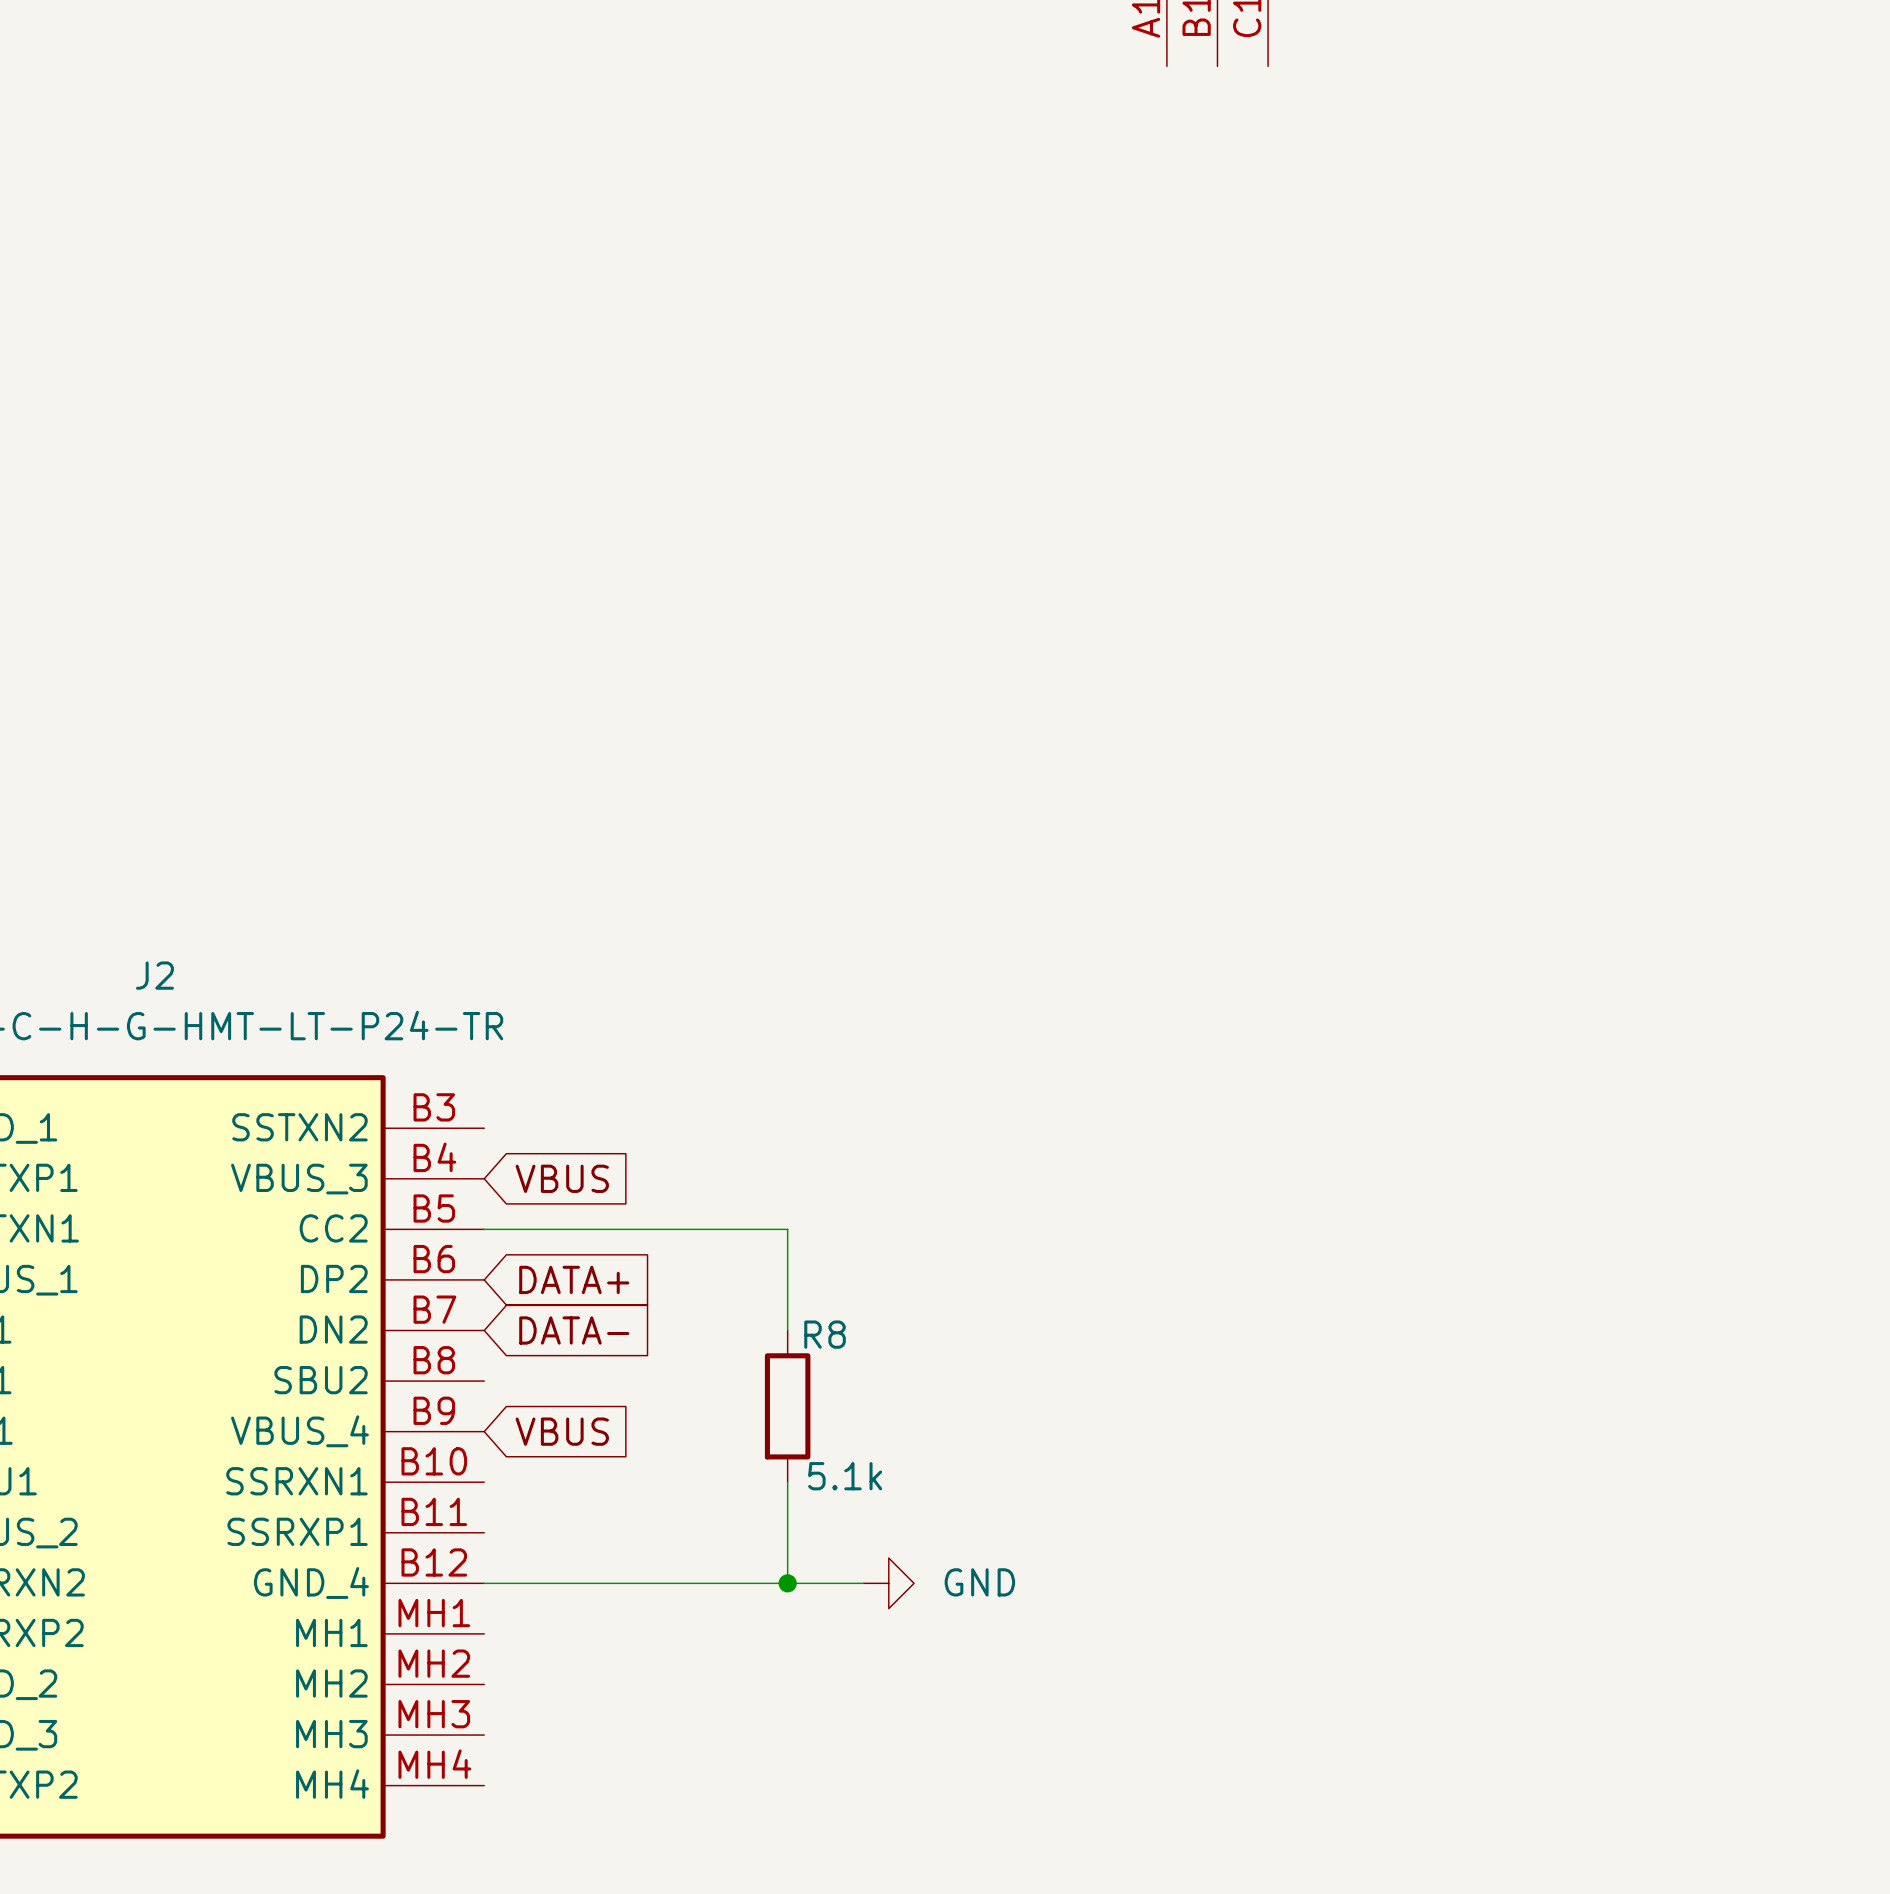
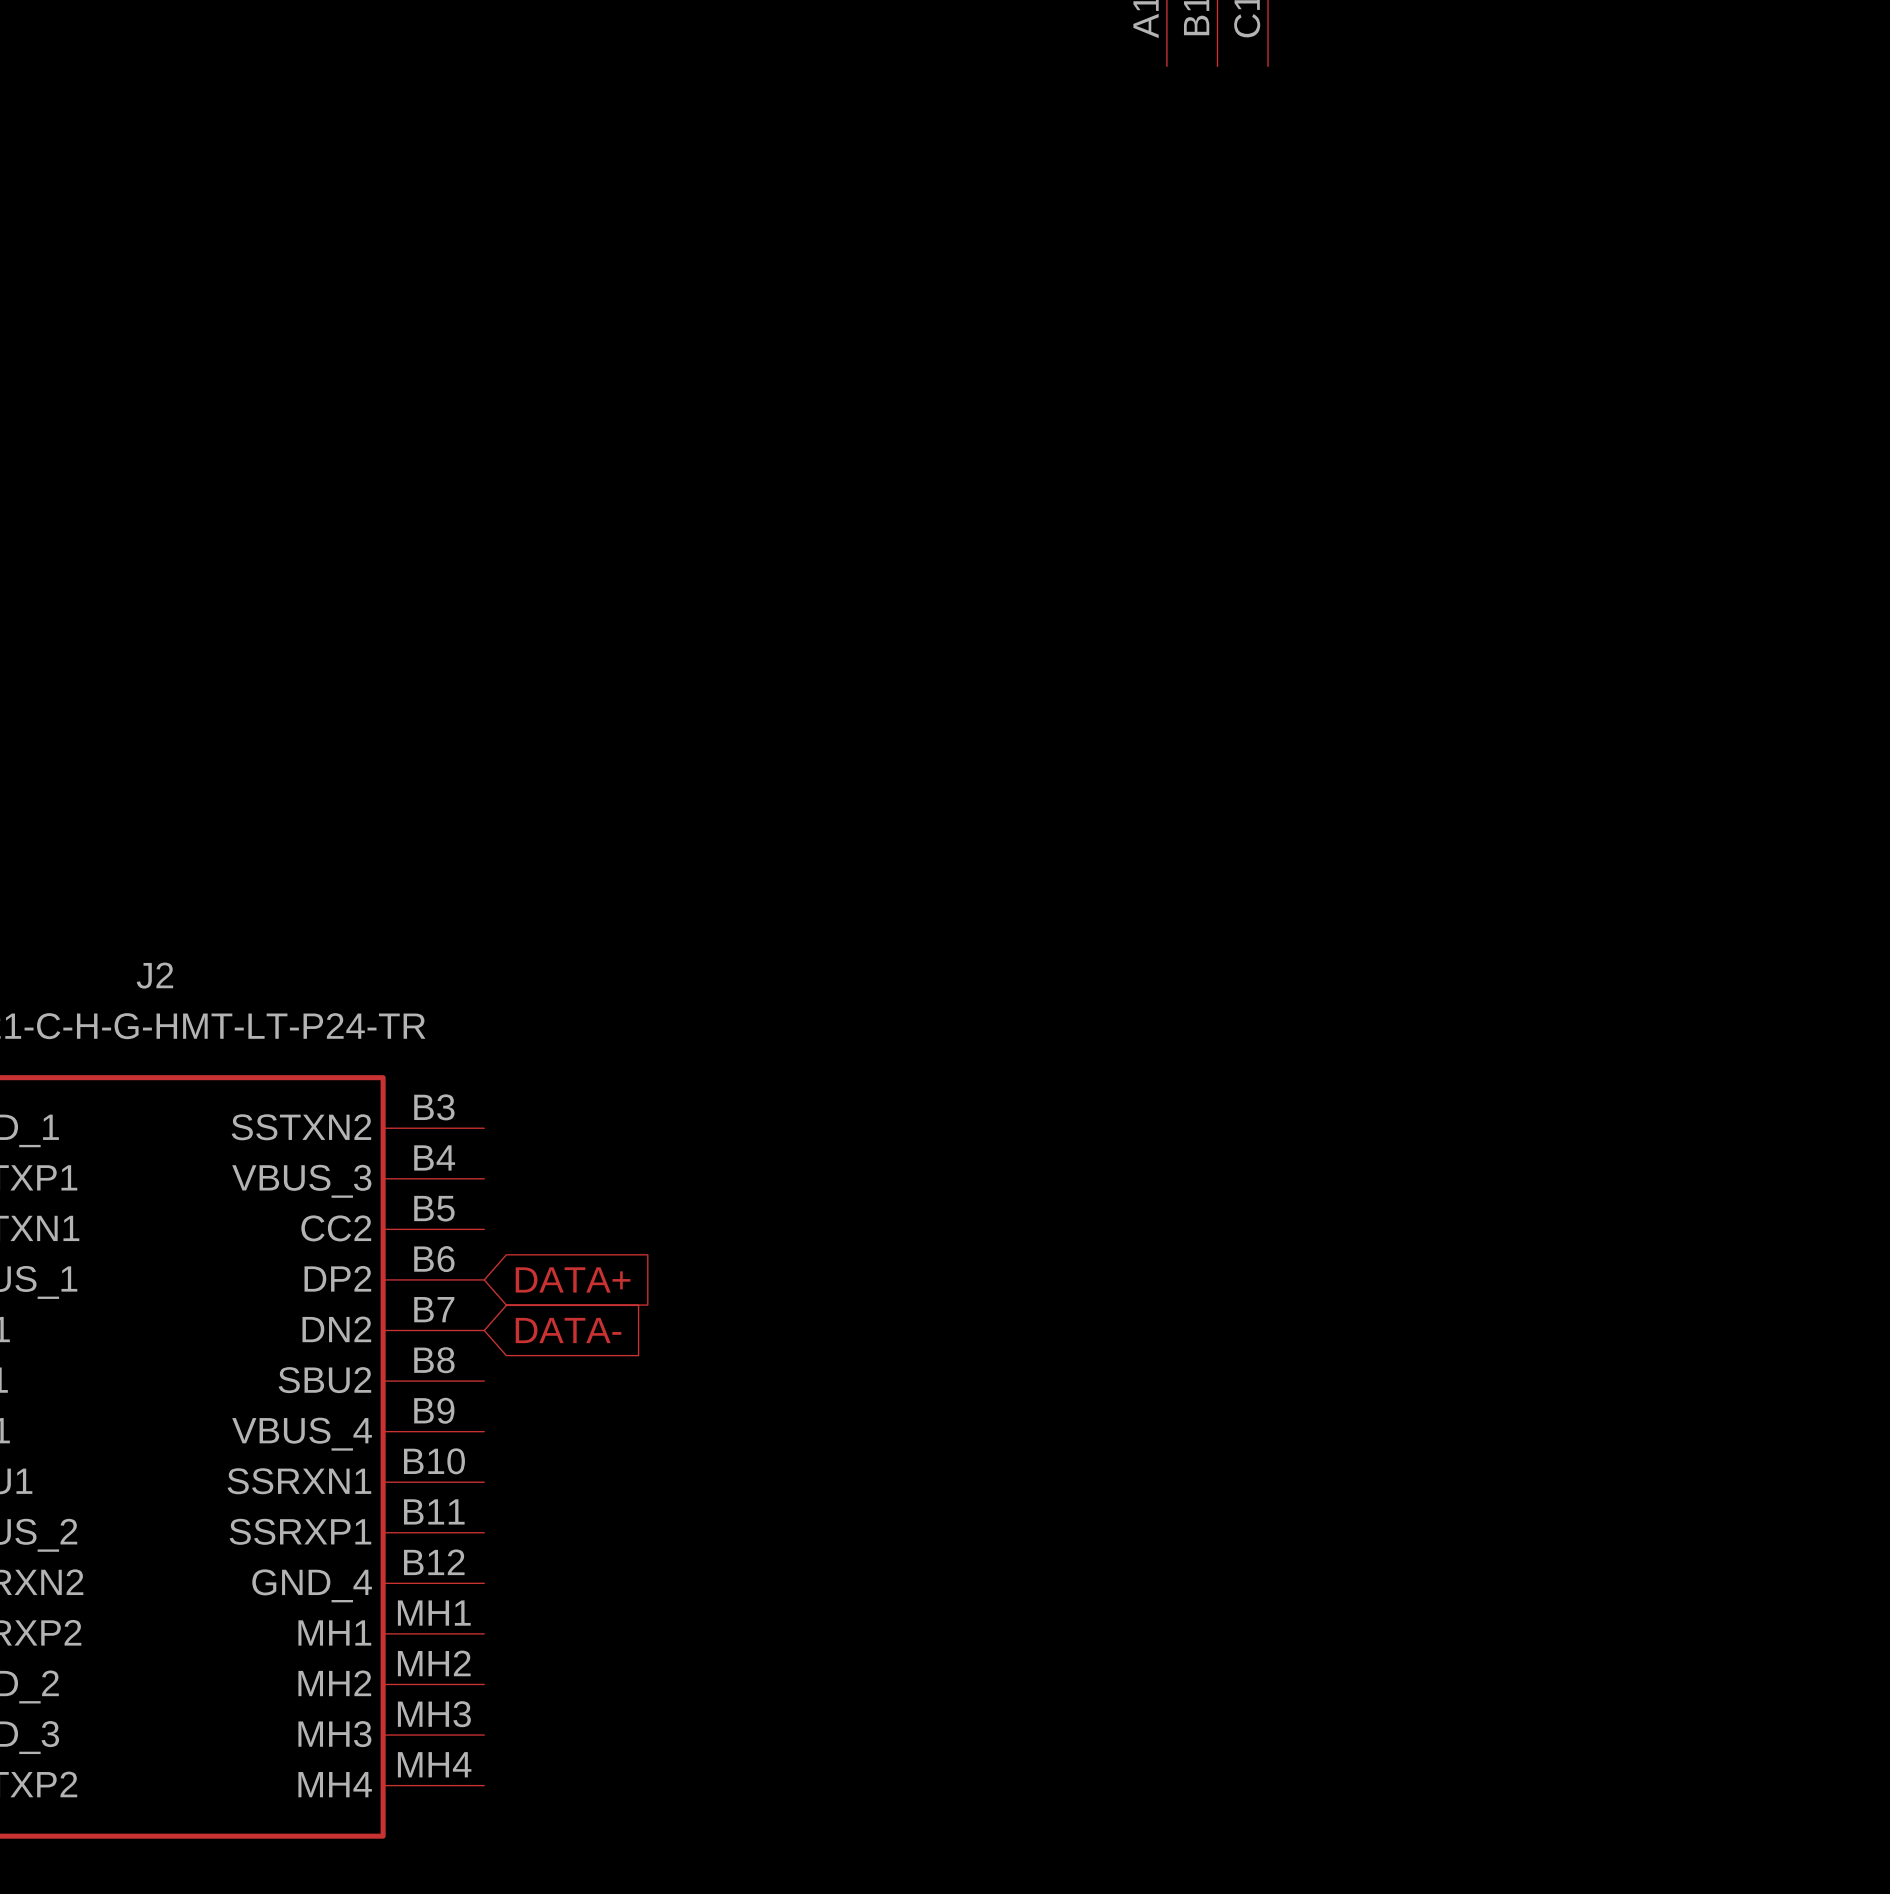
global label: VBUS (562, 1178) -> none
wire: (484, 1229) (787, 1229) (787, 1330) -> none
R8: 5.1k (787, 1406) -> none
global label: VBUS (562, 1431) -> none
wire: (787, 1482) (787, 1583) -> none
wire: (484, 1583) (863, 1583) -> none
junction: (787, 1583) -> none
power symbol: GND (888, 1583) -> none

